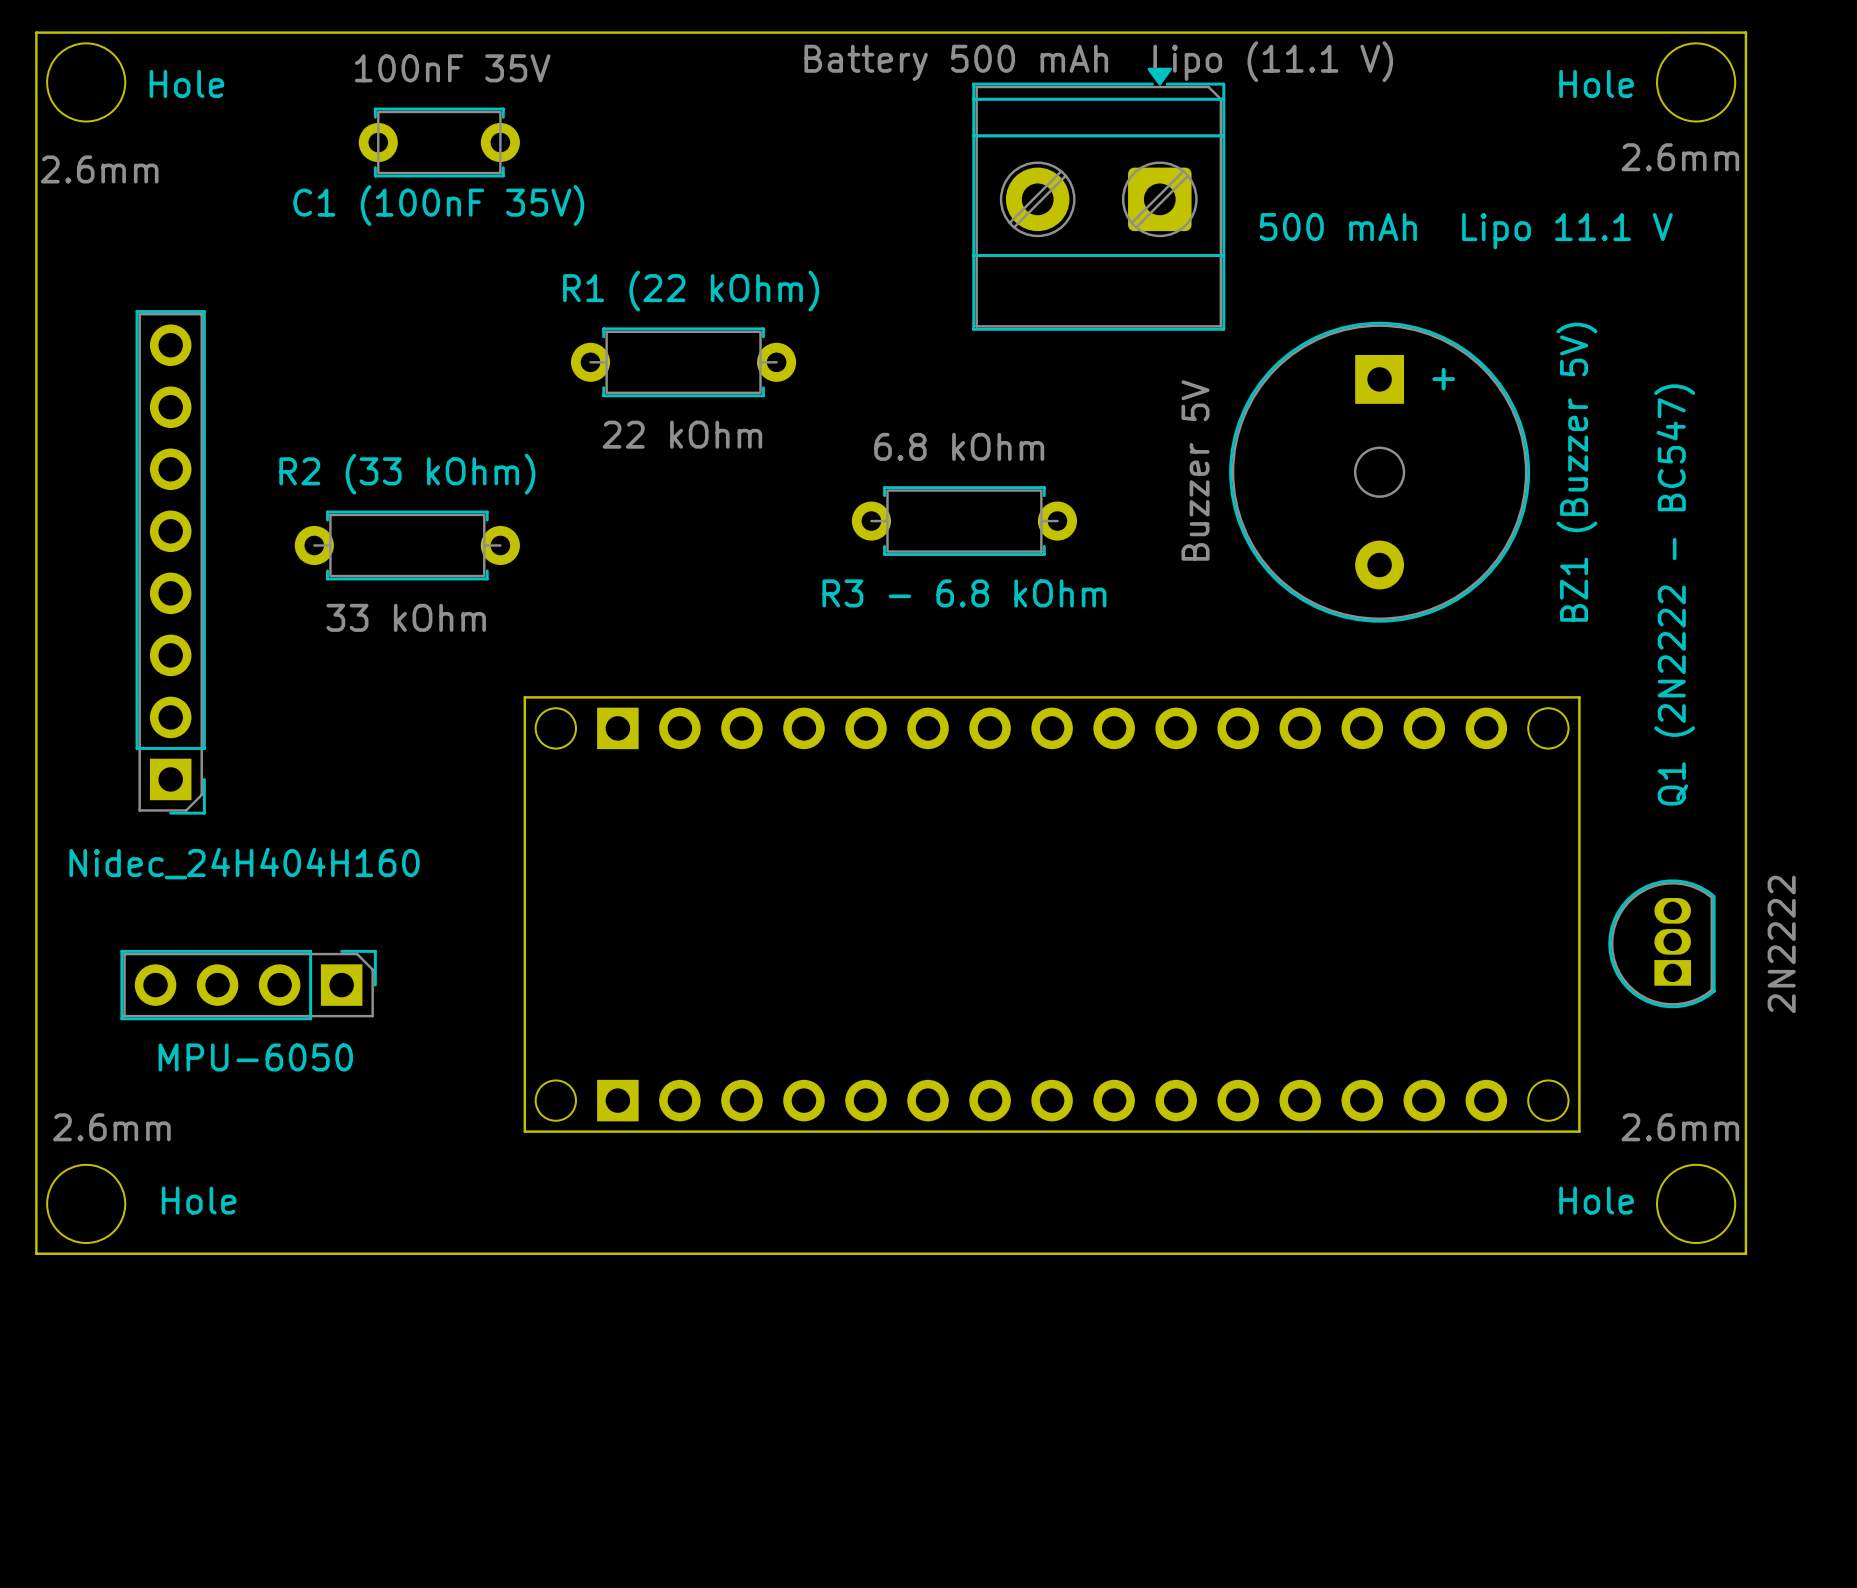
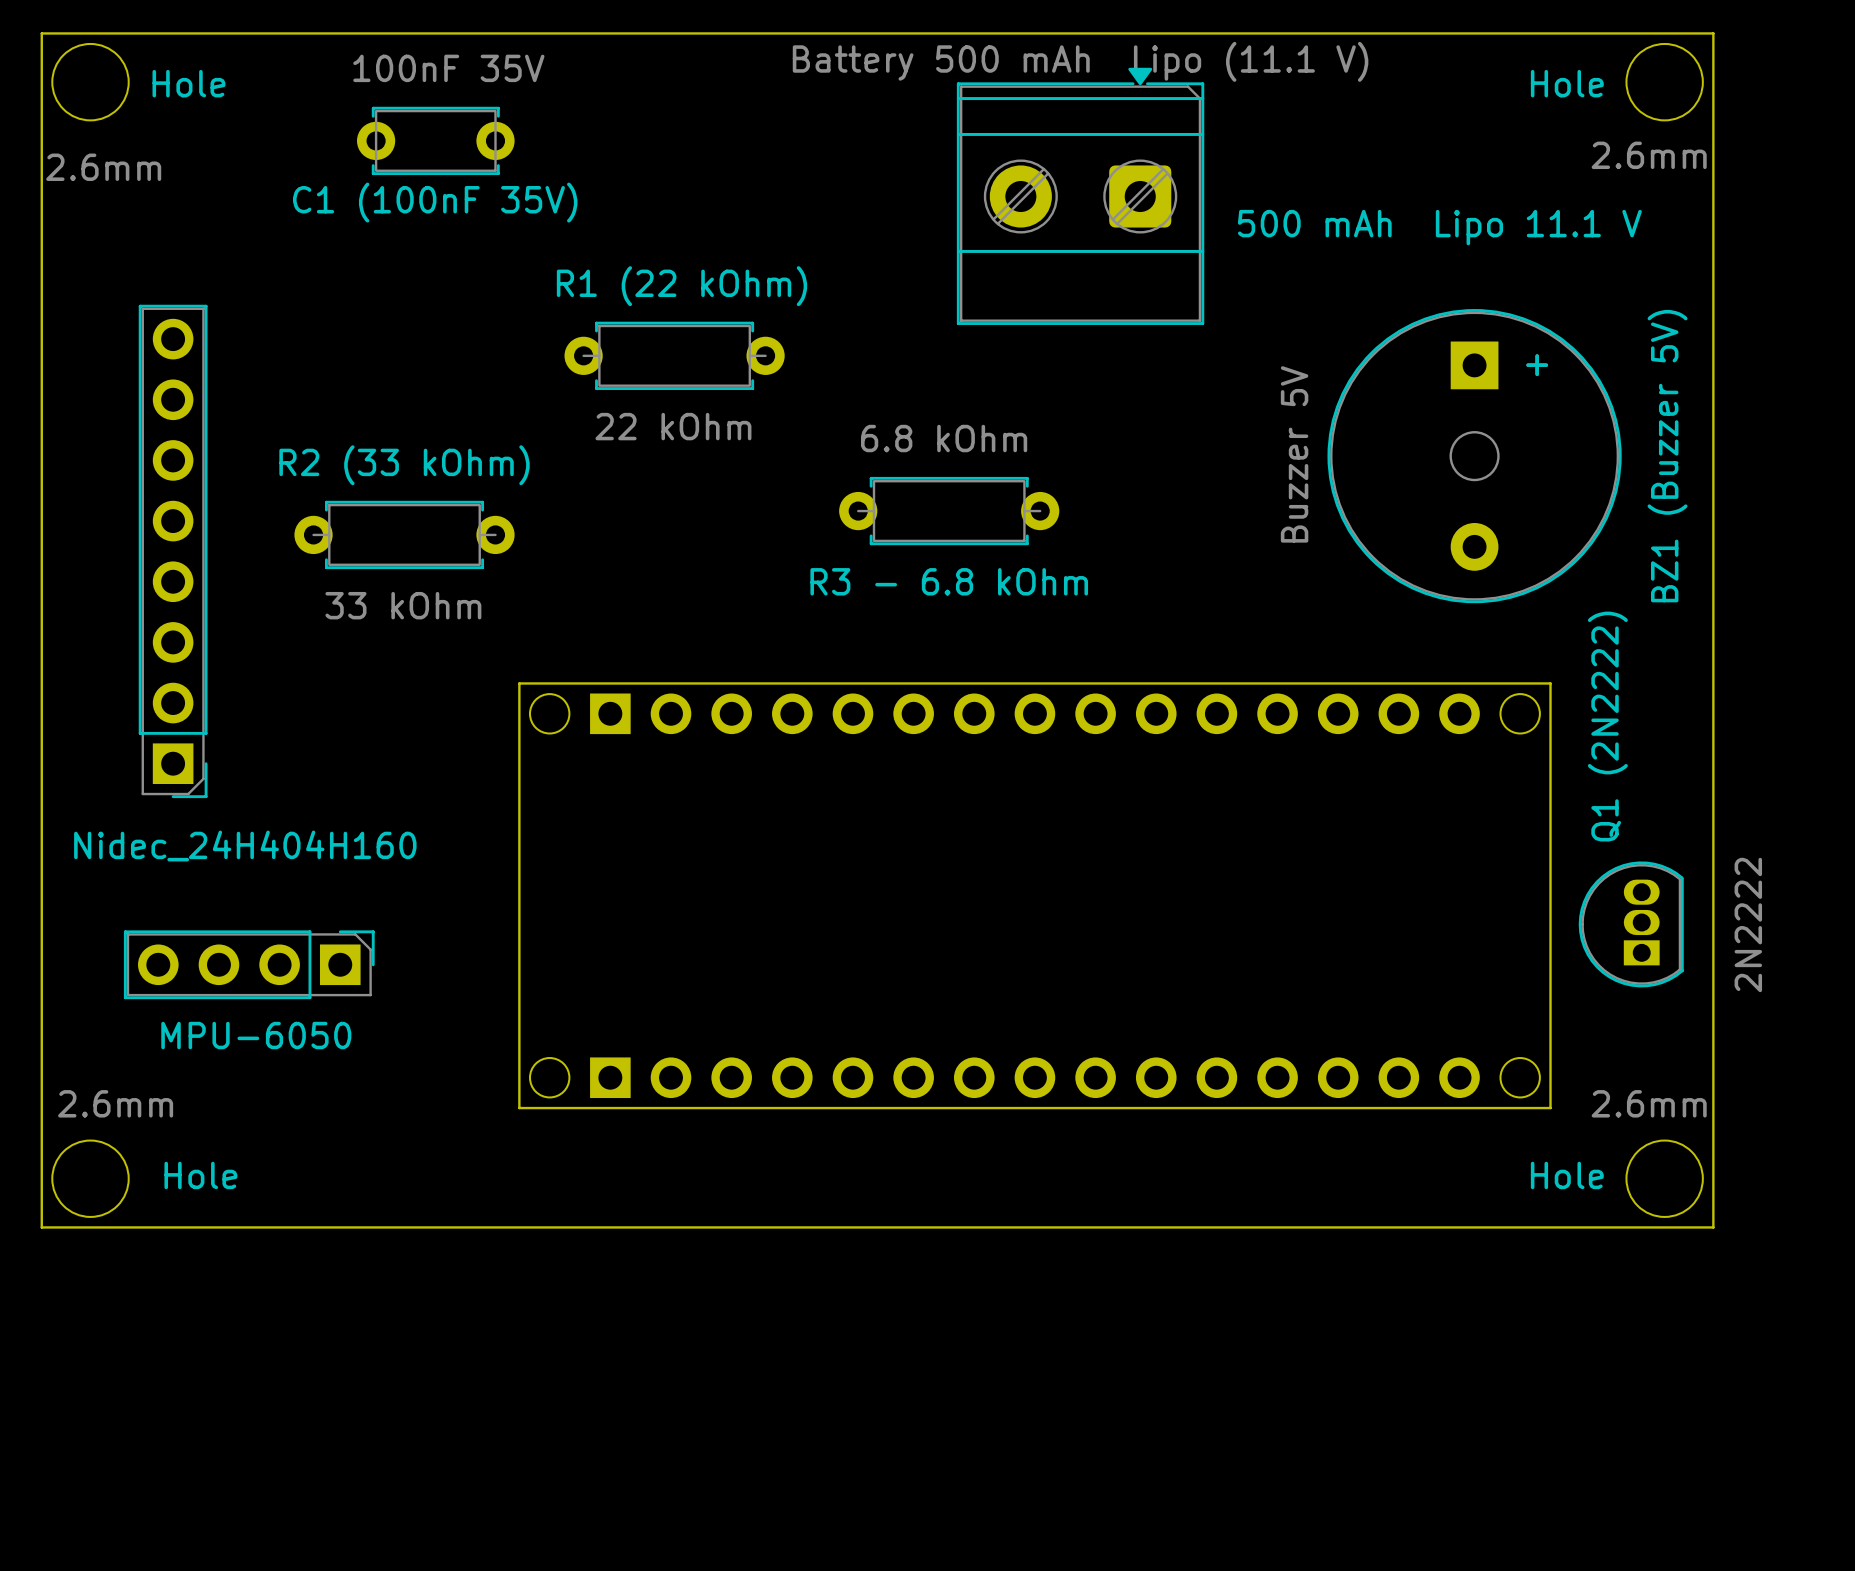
BZ1 (Buzzer 5V) position: (1379, 472) -> (1474, 456)
Q1 (2N2222 - BC547) name: Q1 (2N2222 - BC547) (1674, 594) -> Q1 (2N2222) (1607, 726)

